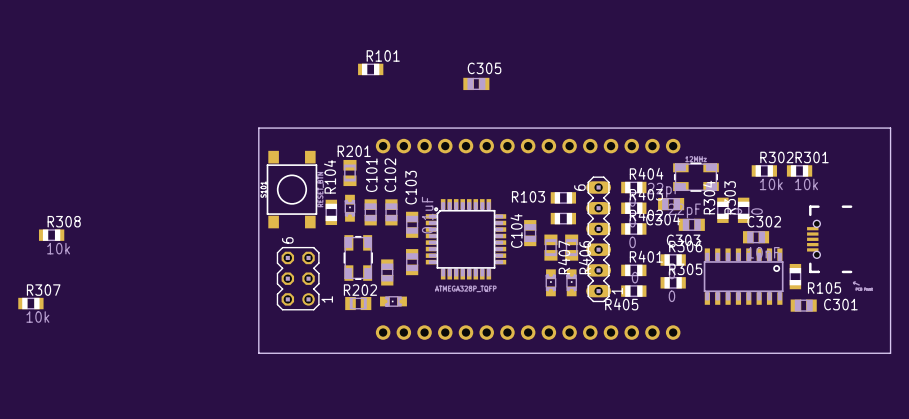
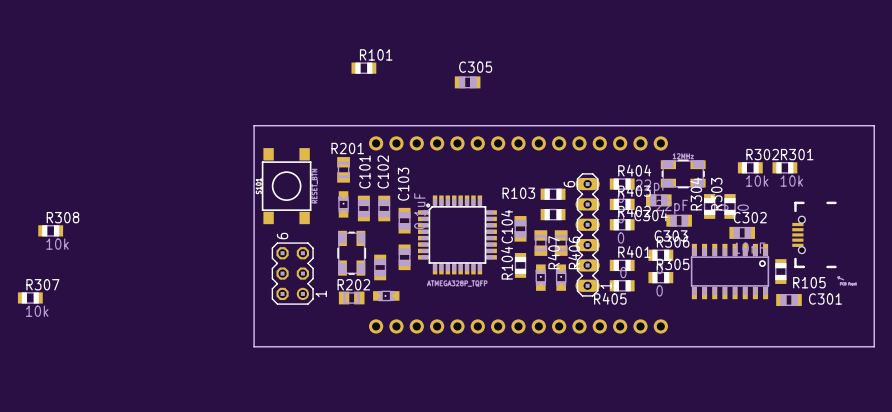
R104 name position: R104 (330, 176) -> R104 (507, 263)
R104 position: (331, 212) -> (520, 265)

